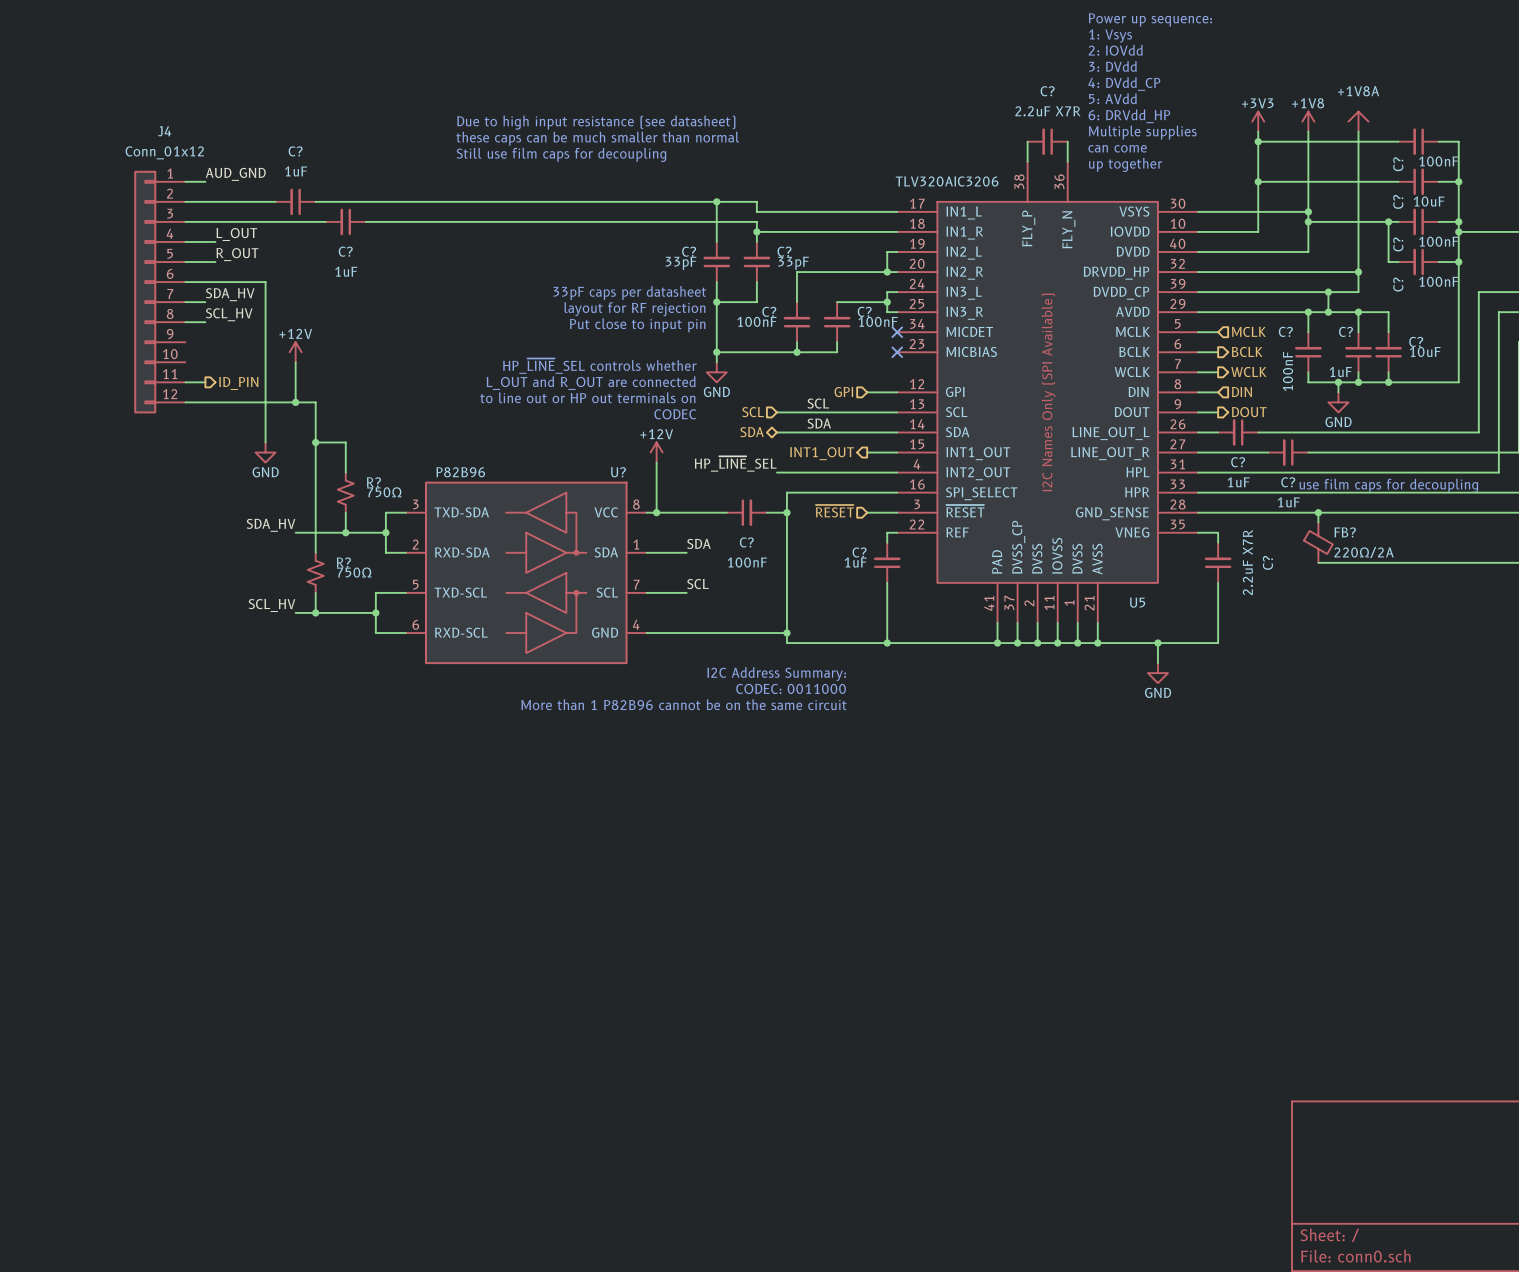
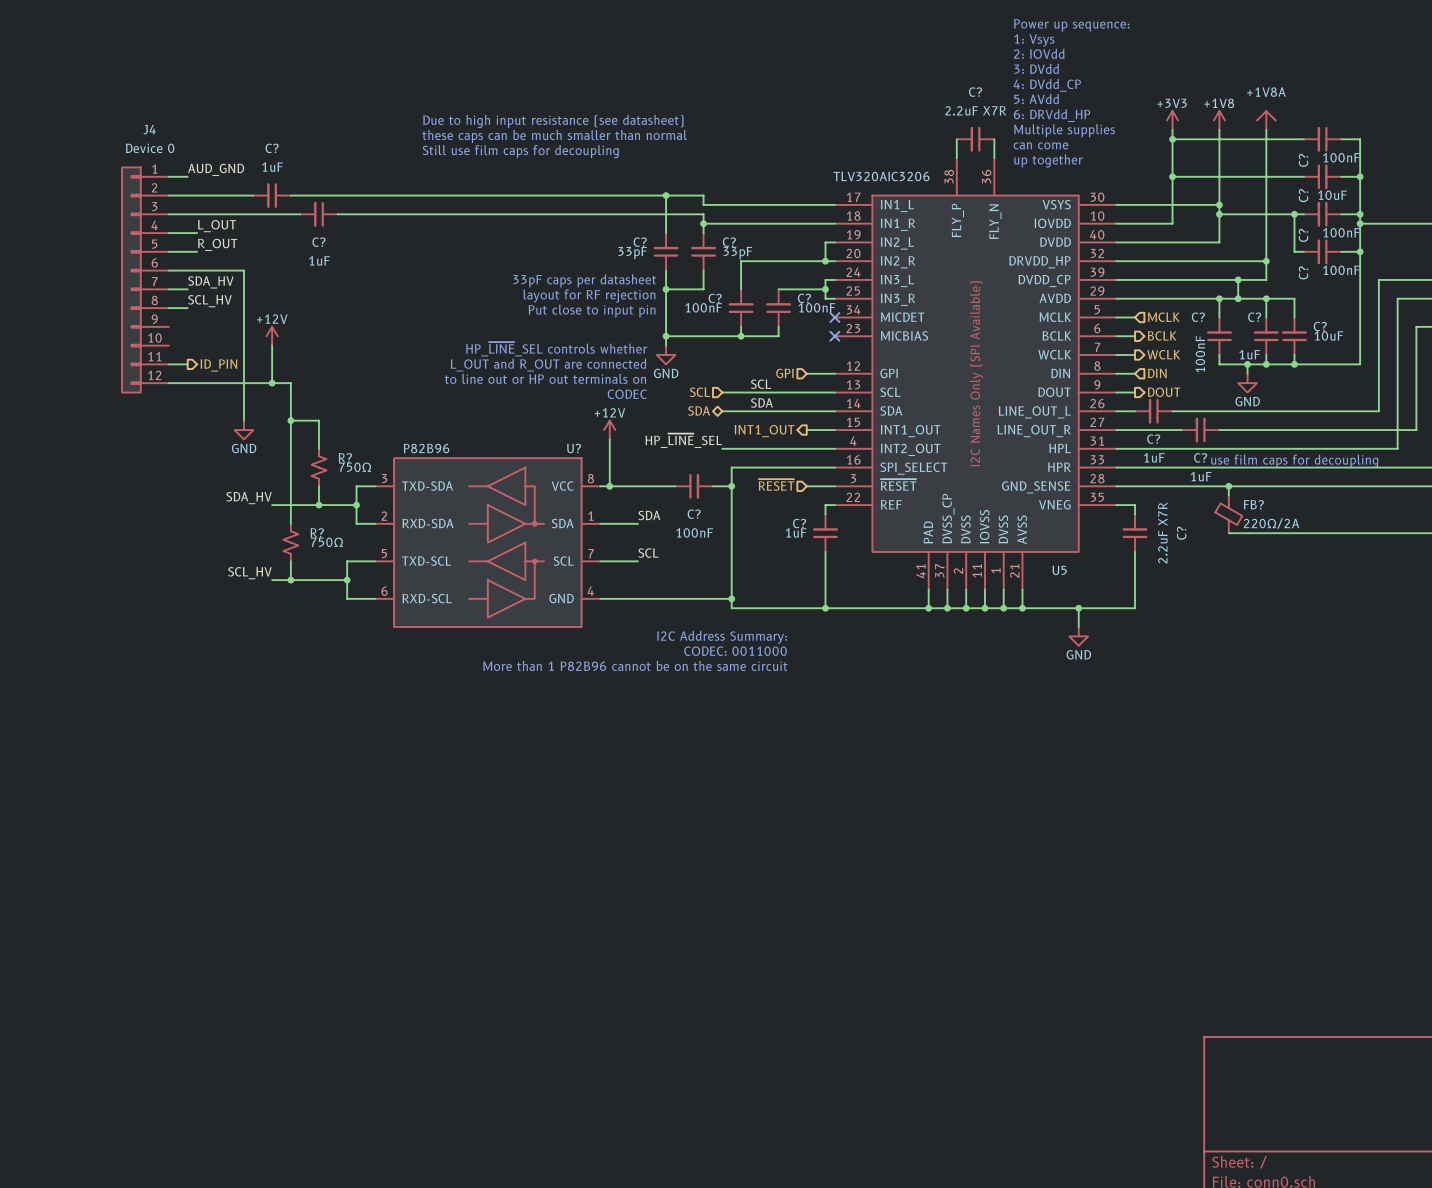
J4 value: Conn_01x12 (164, 152) -> Device 0 (150, 148)

